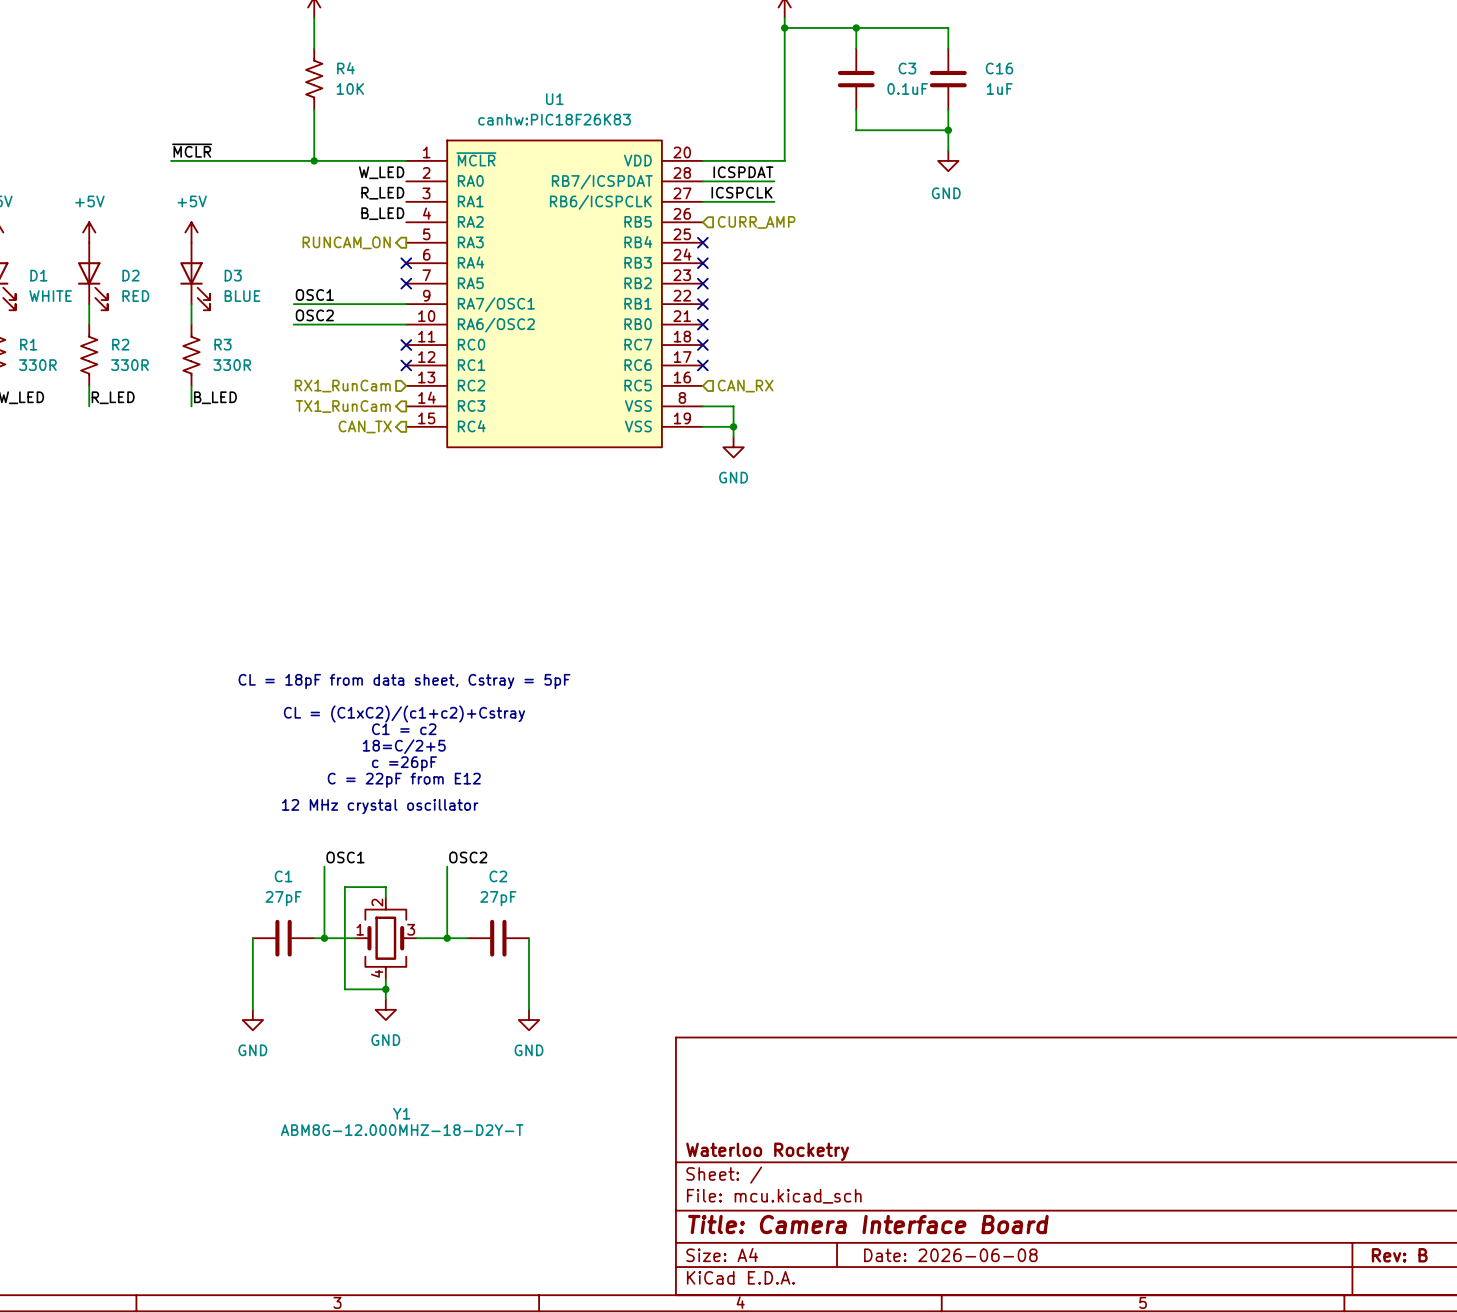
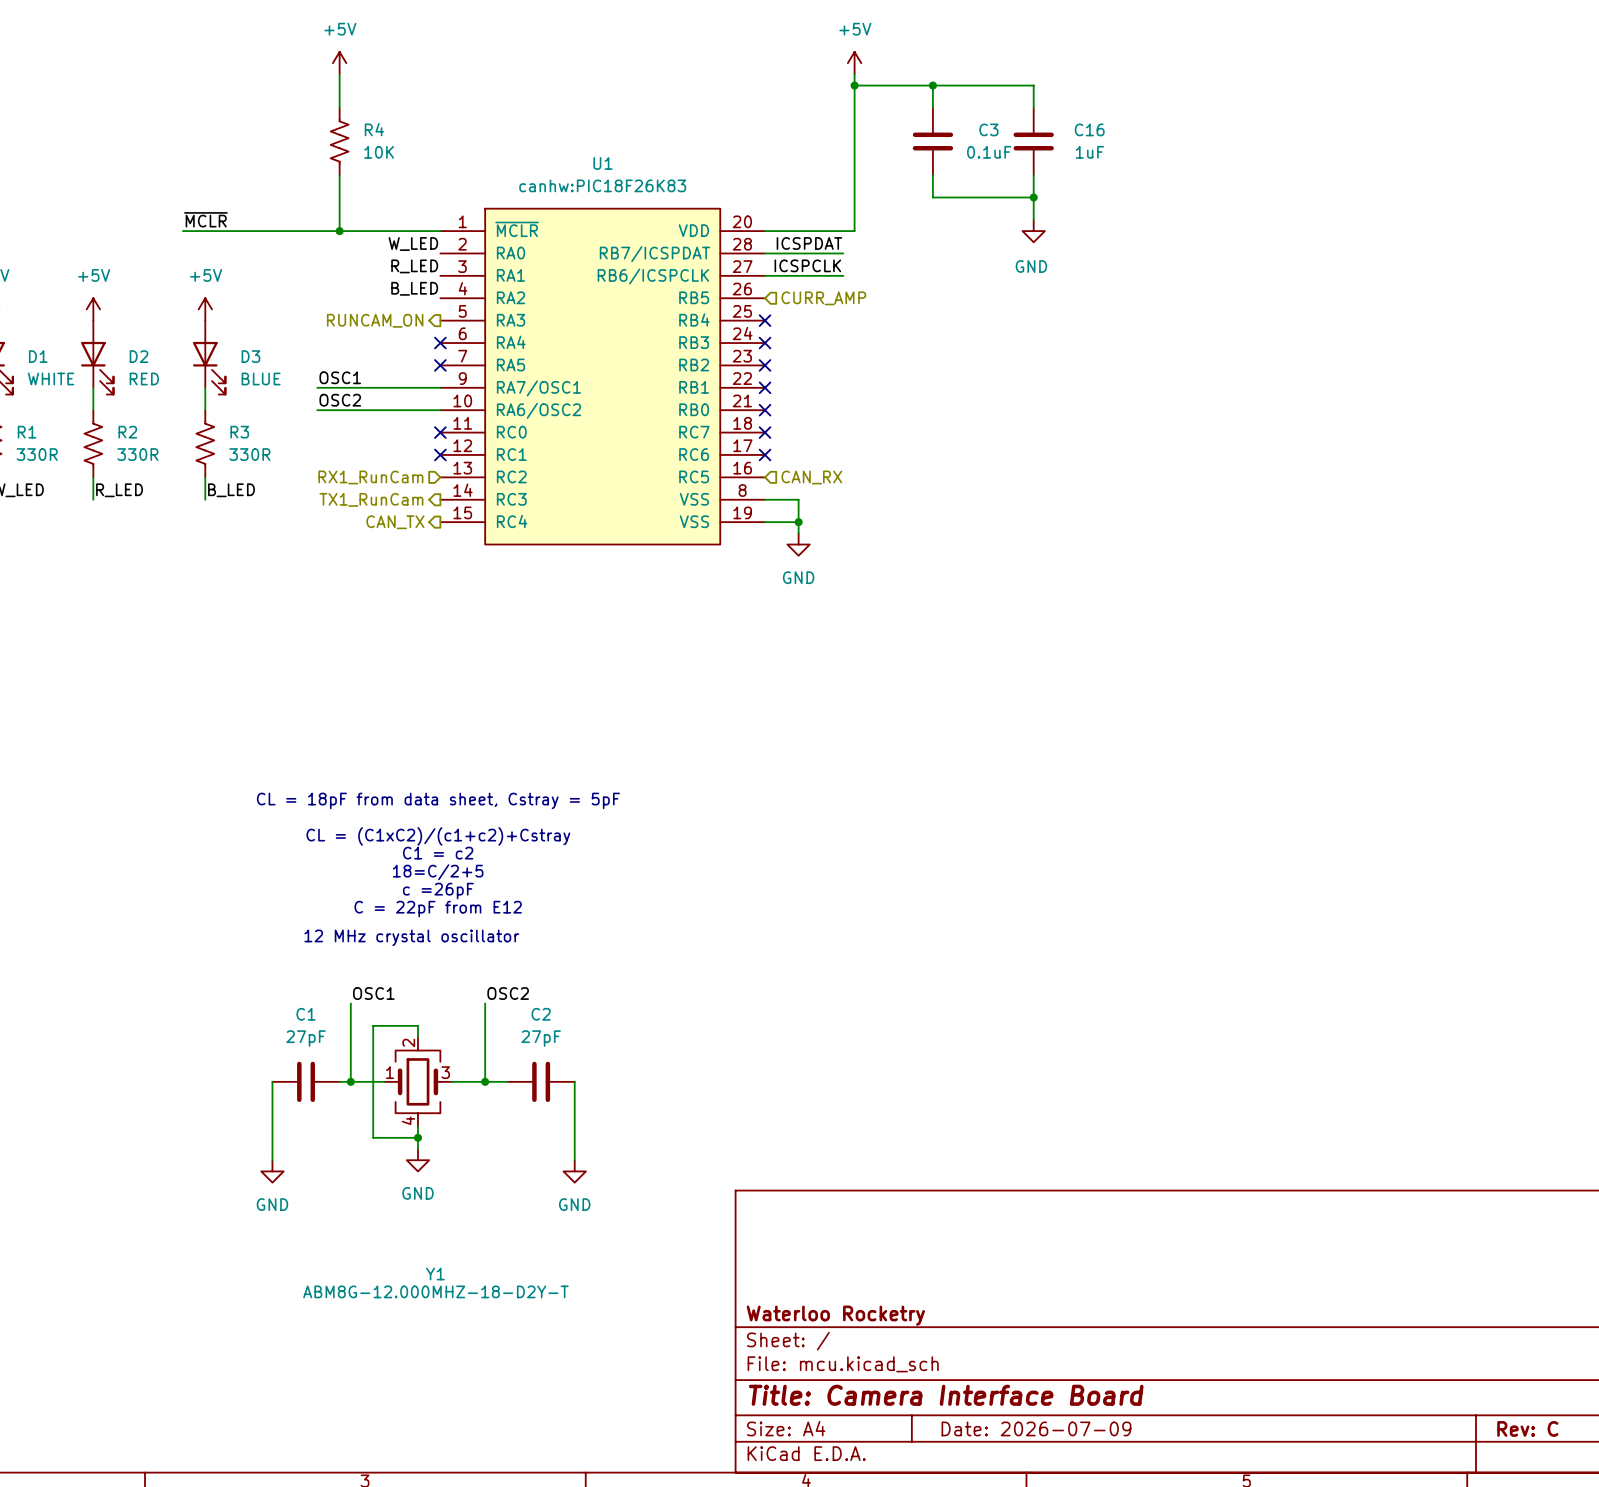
title block: Date: 2026-06-08 (950, 1255) -> Date: 2026-07-09 (1036, 1428)
title block: Rev: B (1399, 1255) -> Rev: C (1527, 1428)

